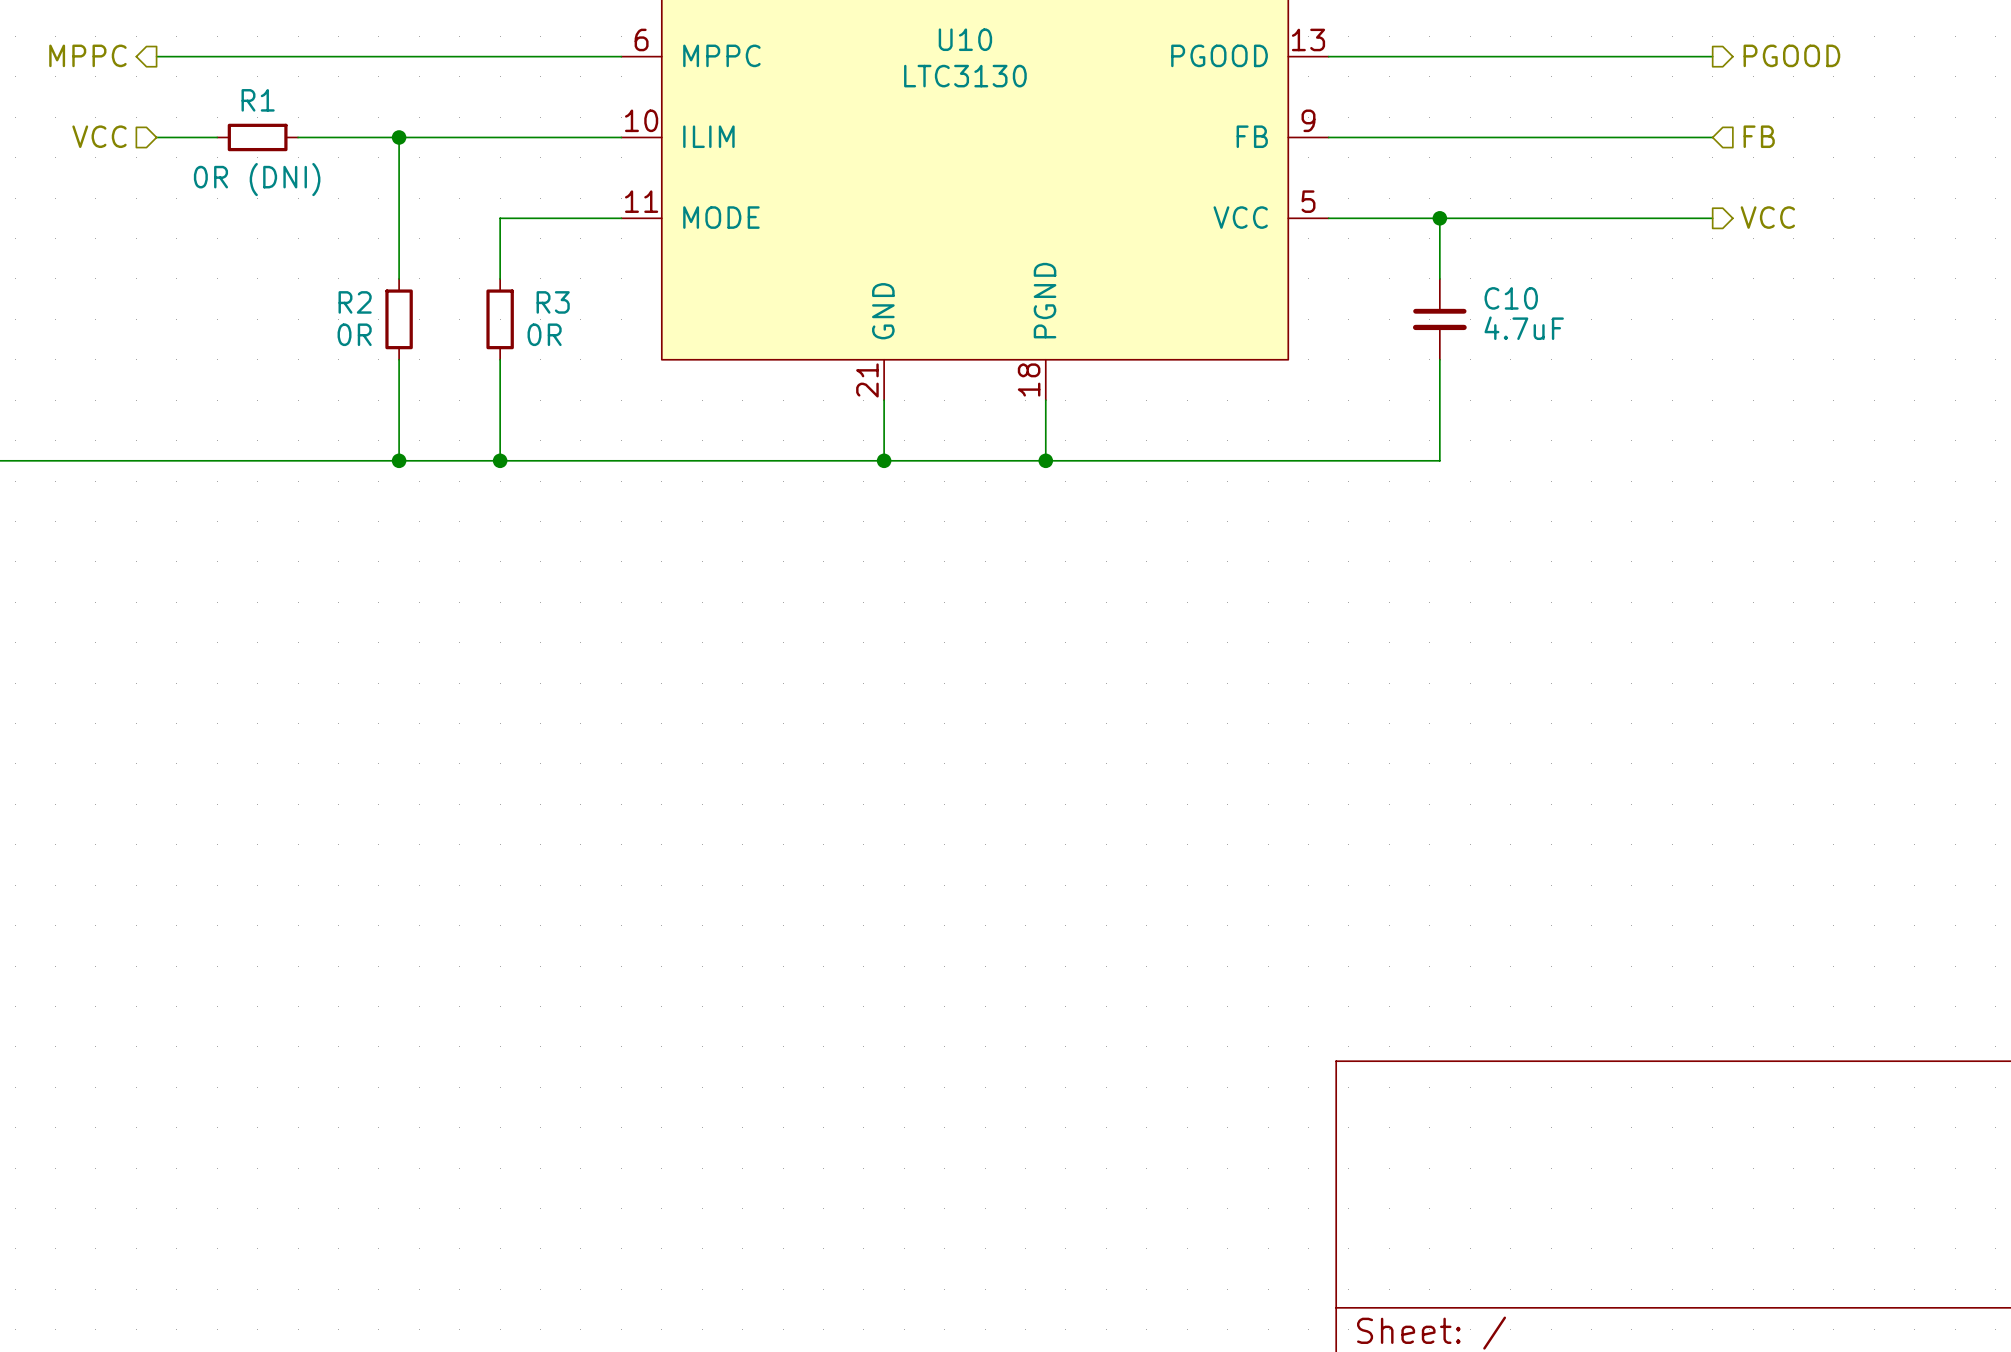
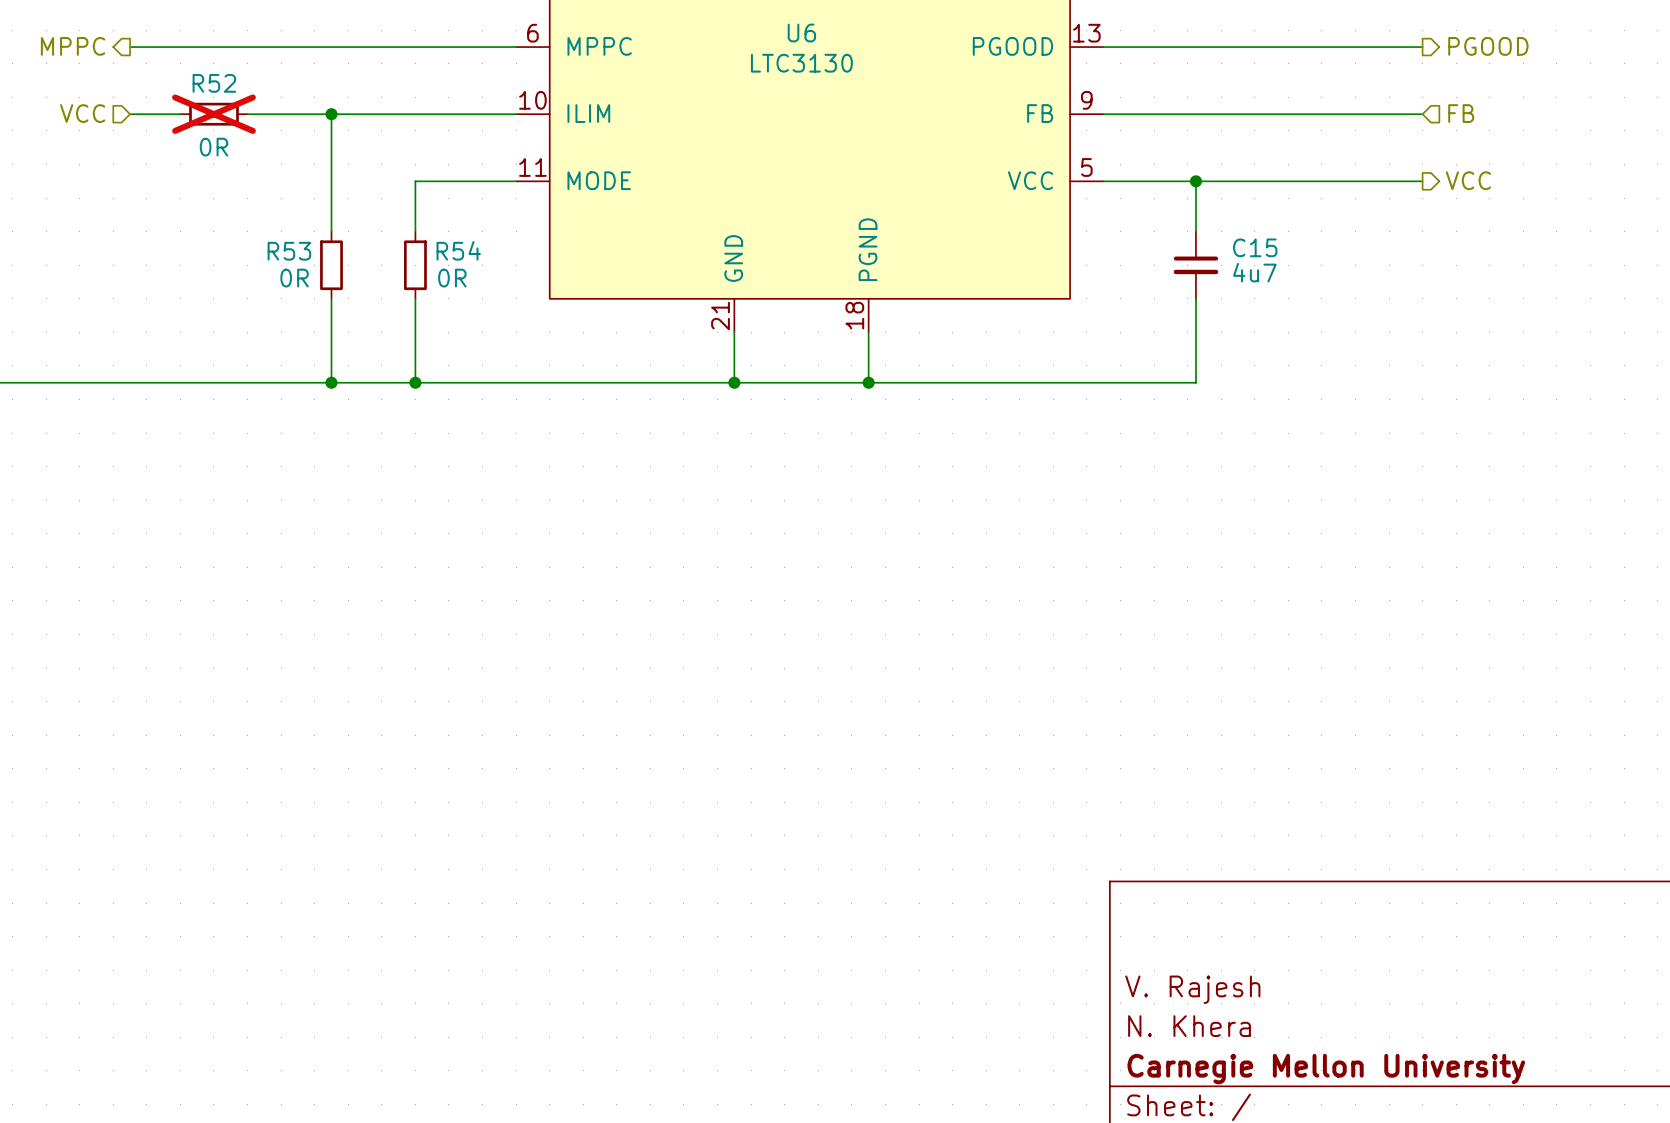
U10 name: U10 (965, 39) -> U6 (801, 32)
R1 name: R1 (258, 100) -> R52 (214, 83)
R1 do-not-place cross: none -> (213, 114)
R1 value: 0R (DNI) (257, 179) -> 0R (213, 147)
C10 name: C10 (1511, 298) -> C15 (1255, 247)
R2 name: R2 (355, 302) -> R53 (289, 251)
R3 name: R3 (553, 302) -> R54 (458, 250)
C10 value: 4.7uF (1524, 328) -> 4u7 (1254, 272)
title block: none -> V. Rajesh (1192, 989)
title block: none -> N. Khera (1189, 1026)
title block: none -> Carnegie Mellon University (1326, 1069)

